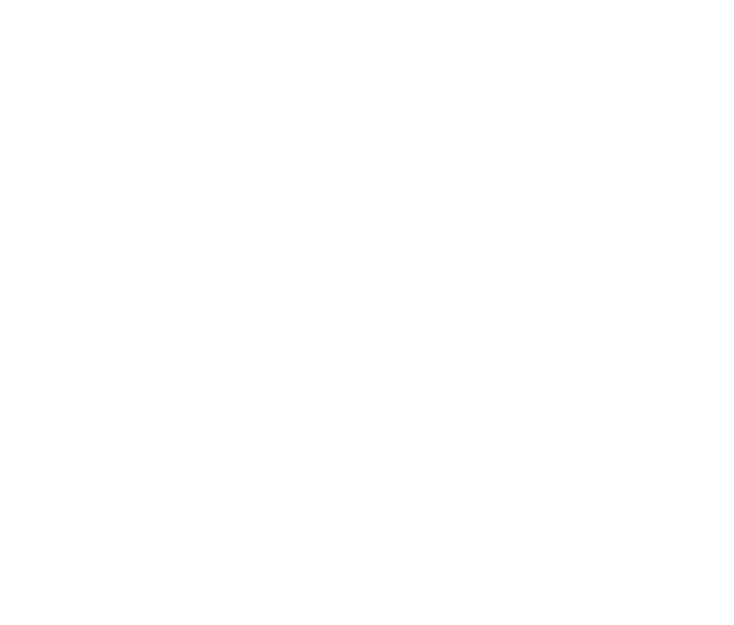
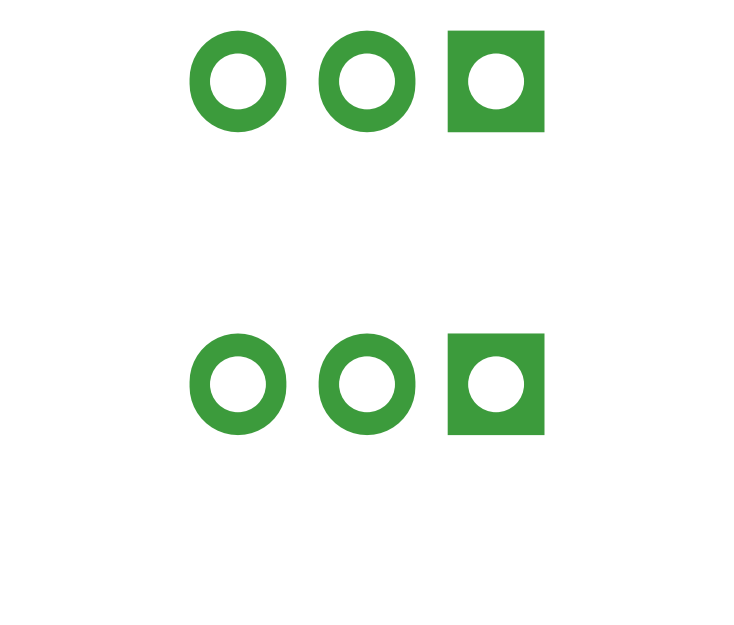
part: none -> (367, 81)
part: none -> (367, 384)

